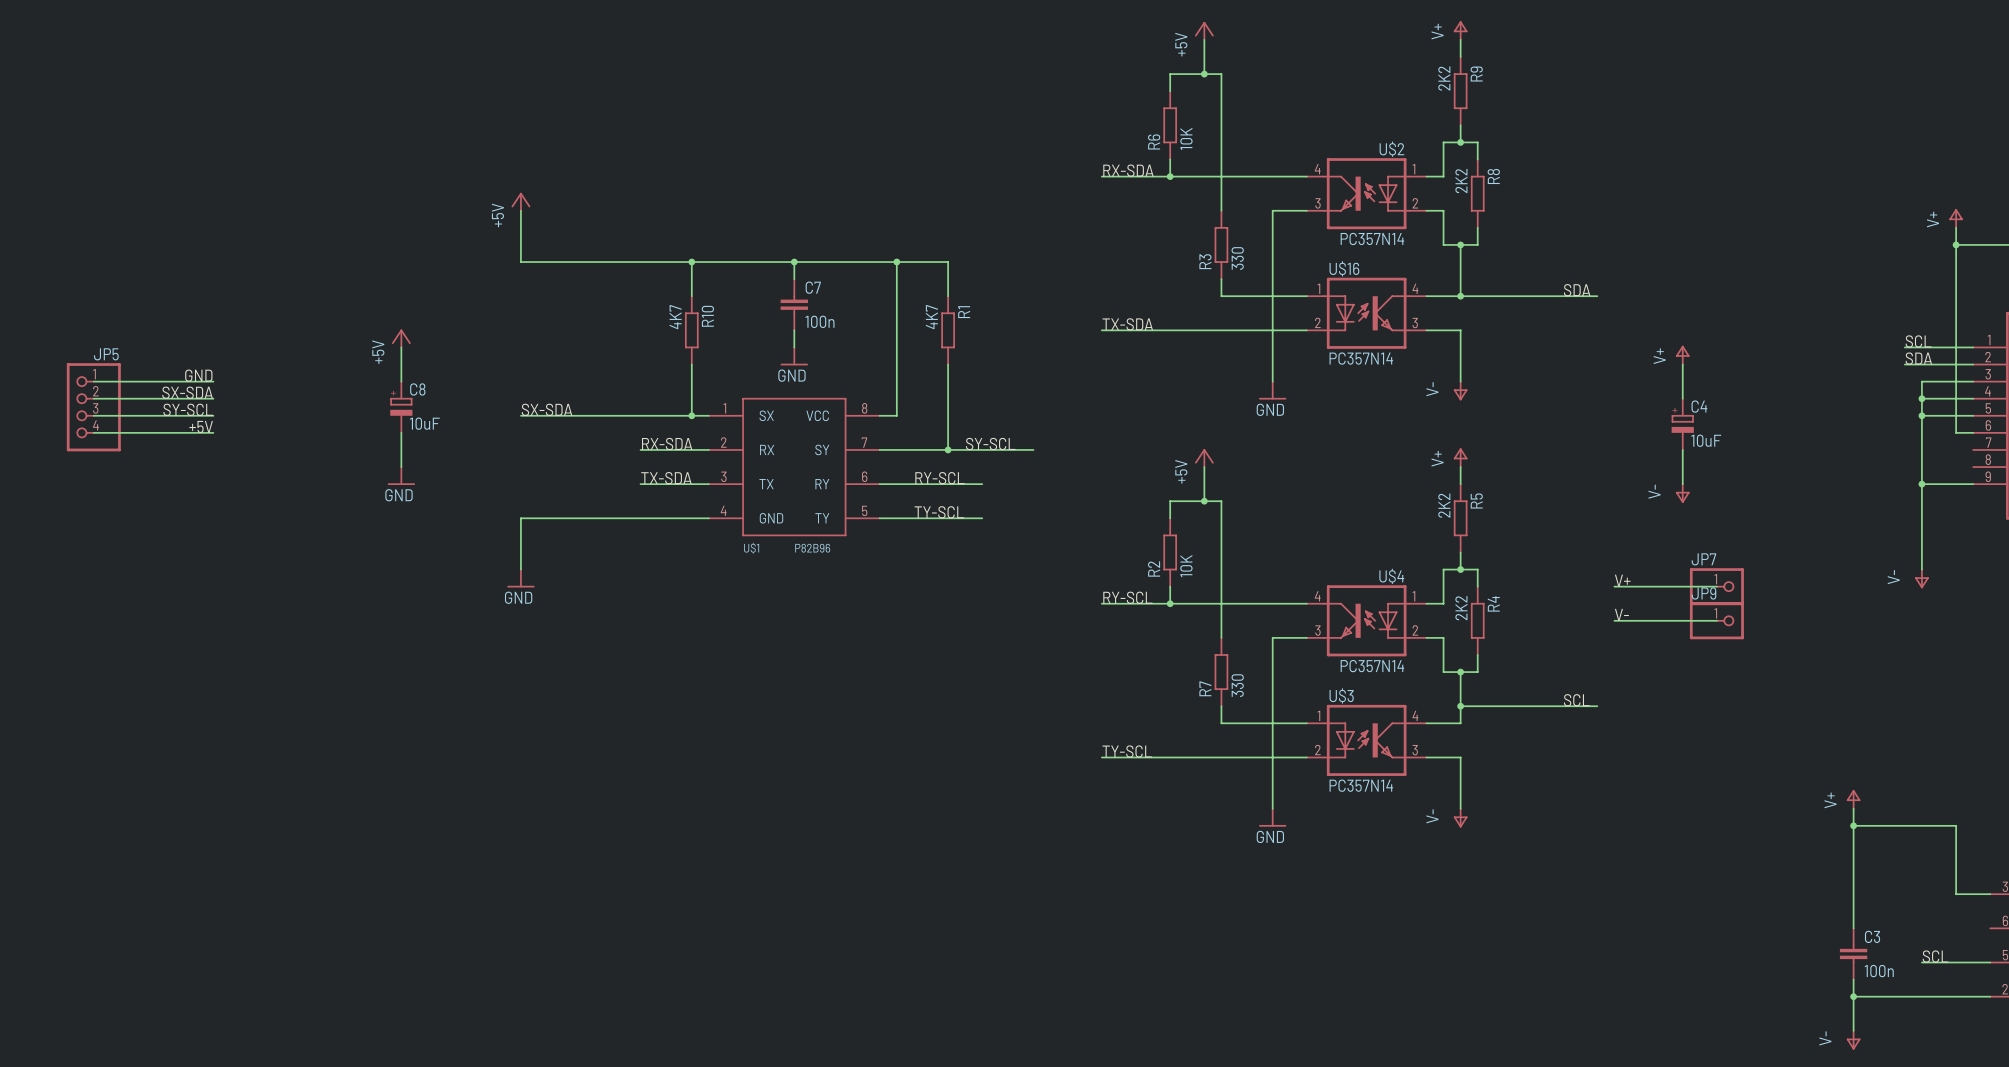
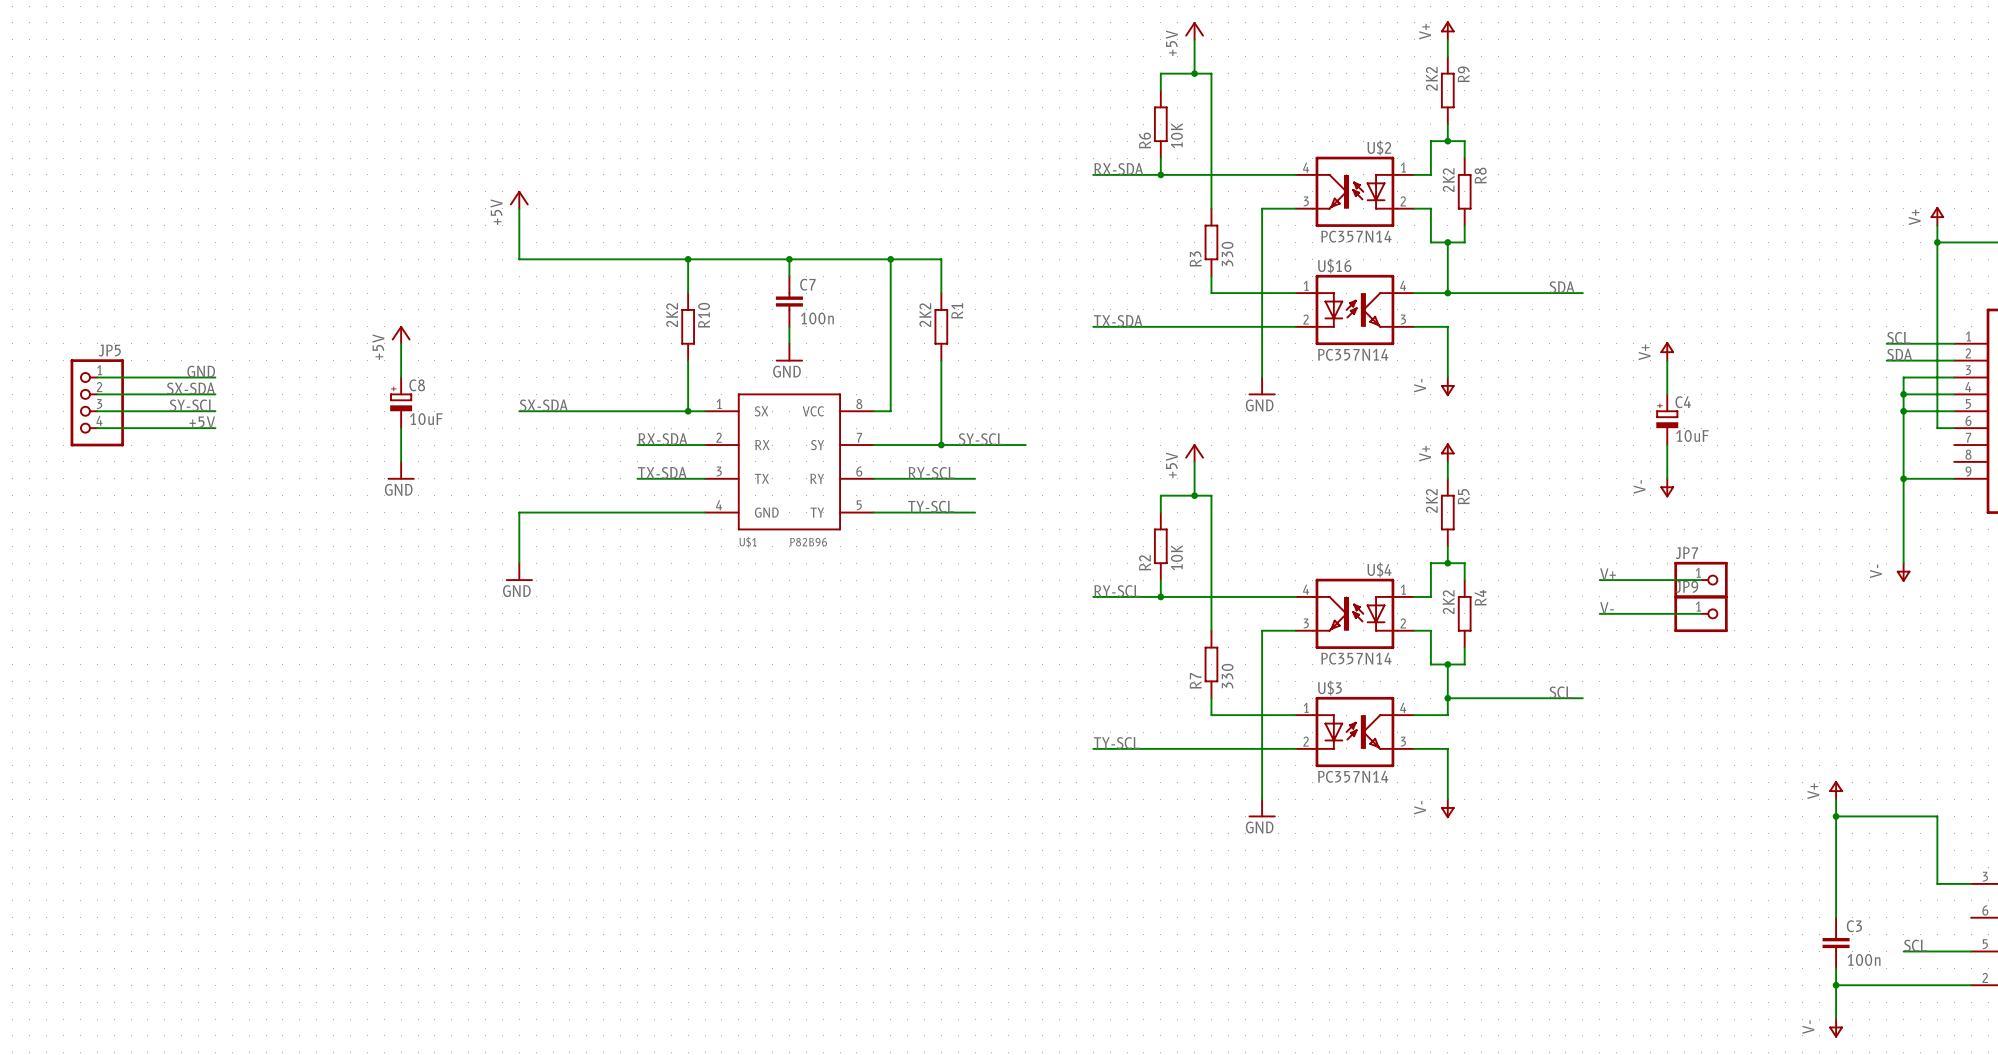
R10 value: 4K7 (675, 317) -> 2K2 (672, 315)
R1 value: 4K7 (931, 317) -> 2K2 (925, 315)

